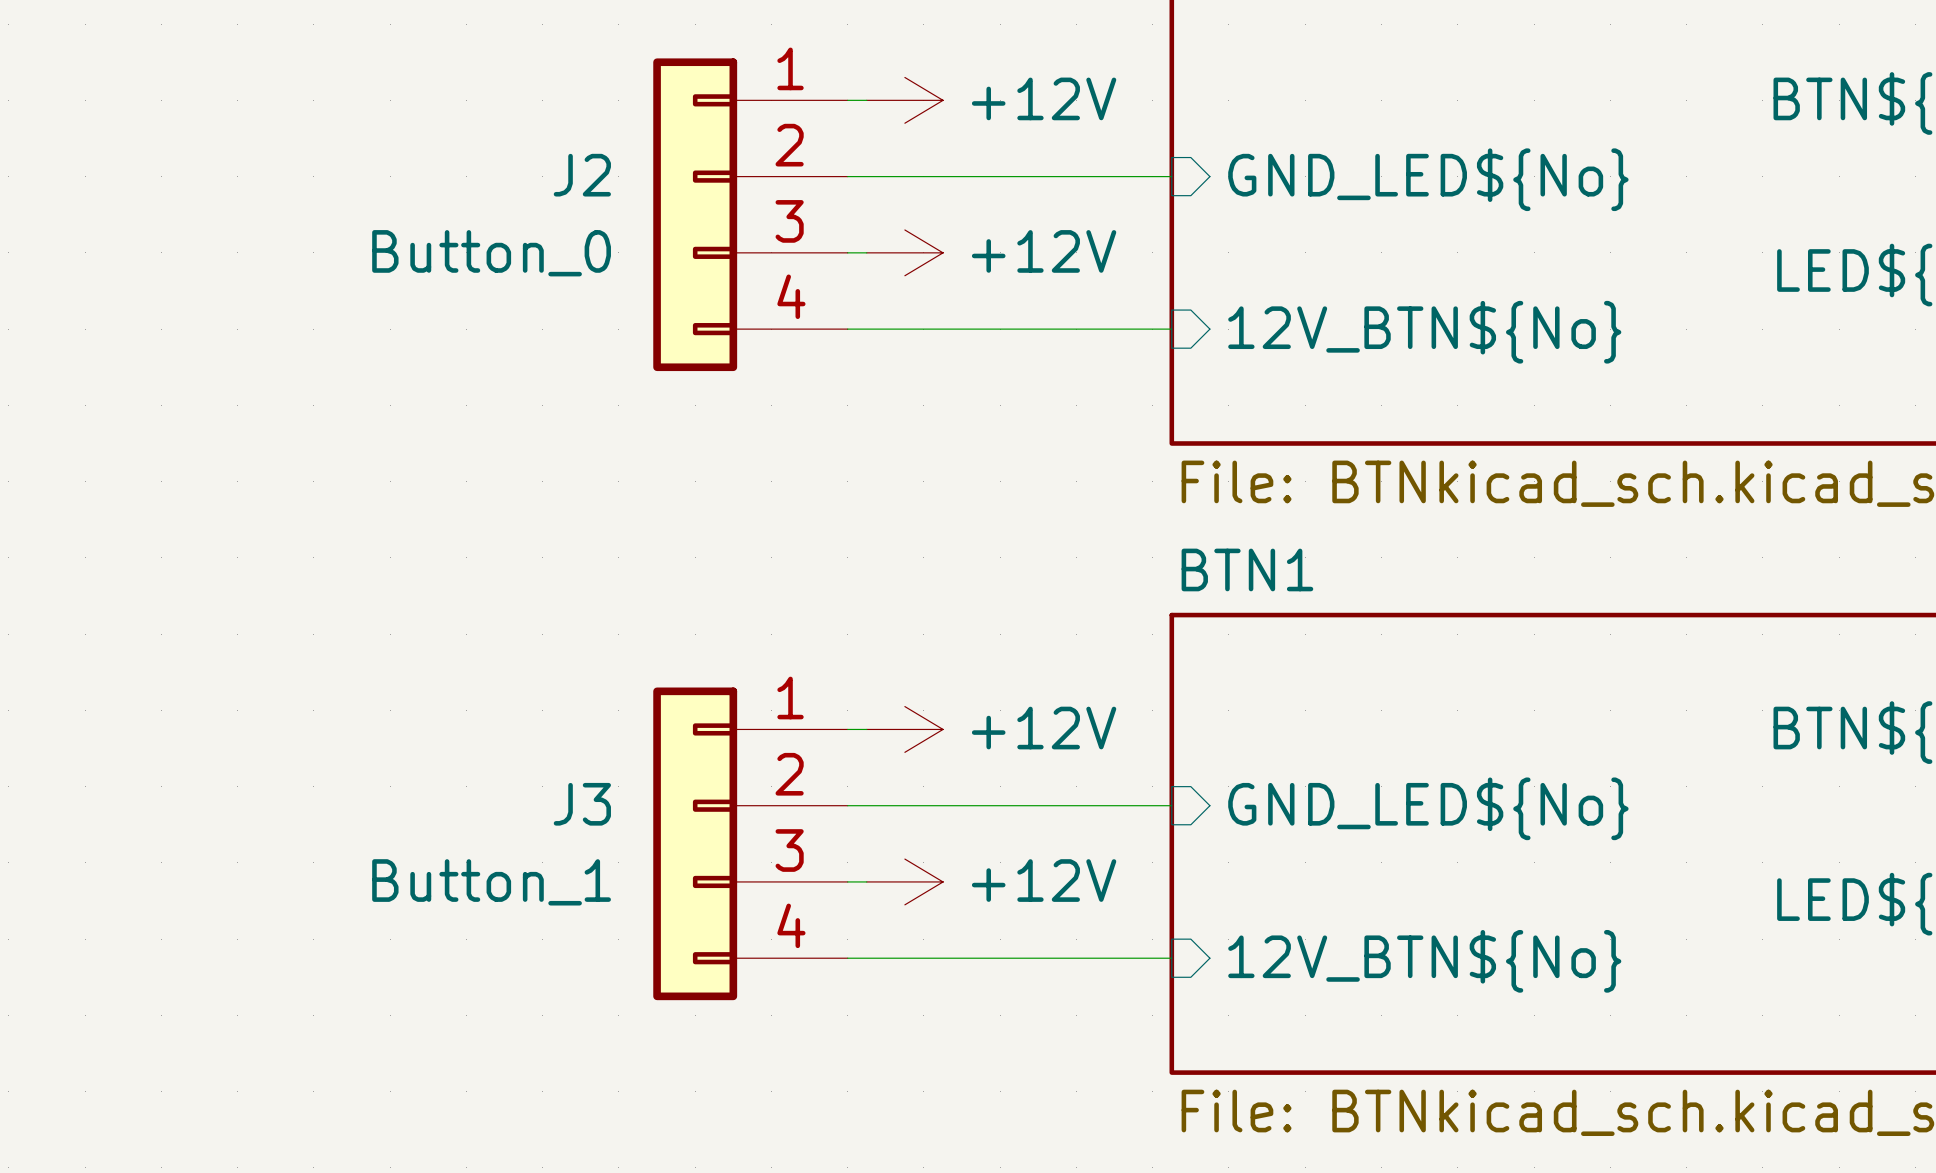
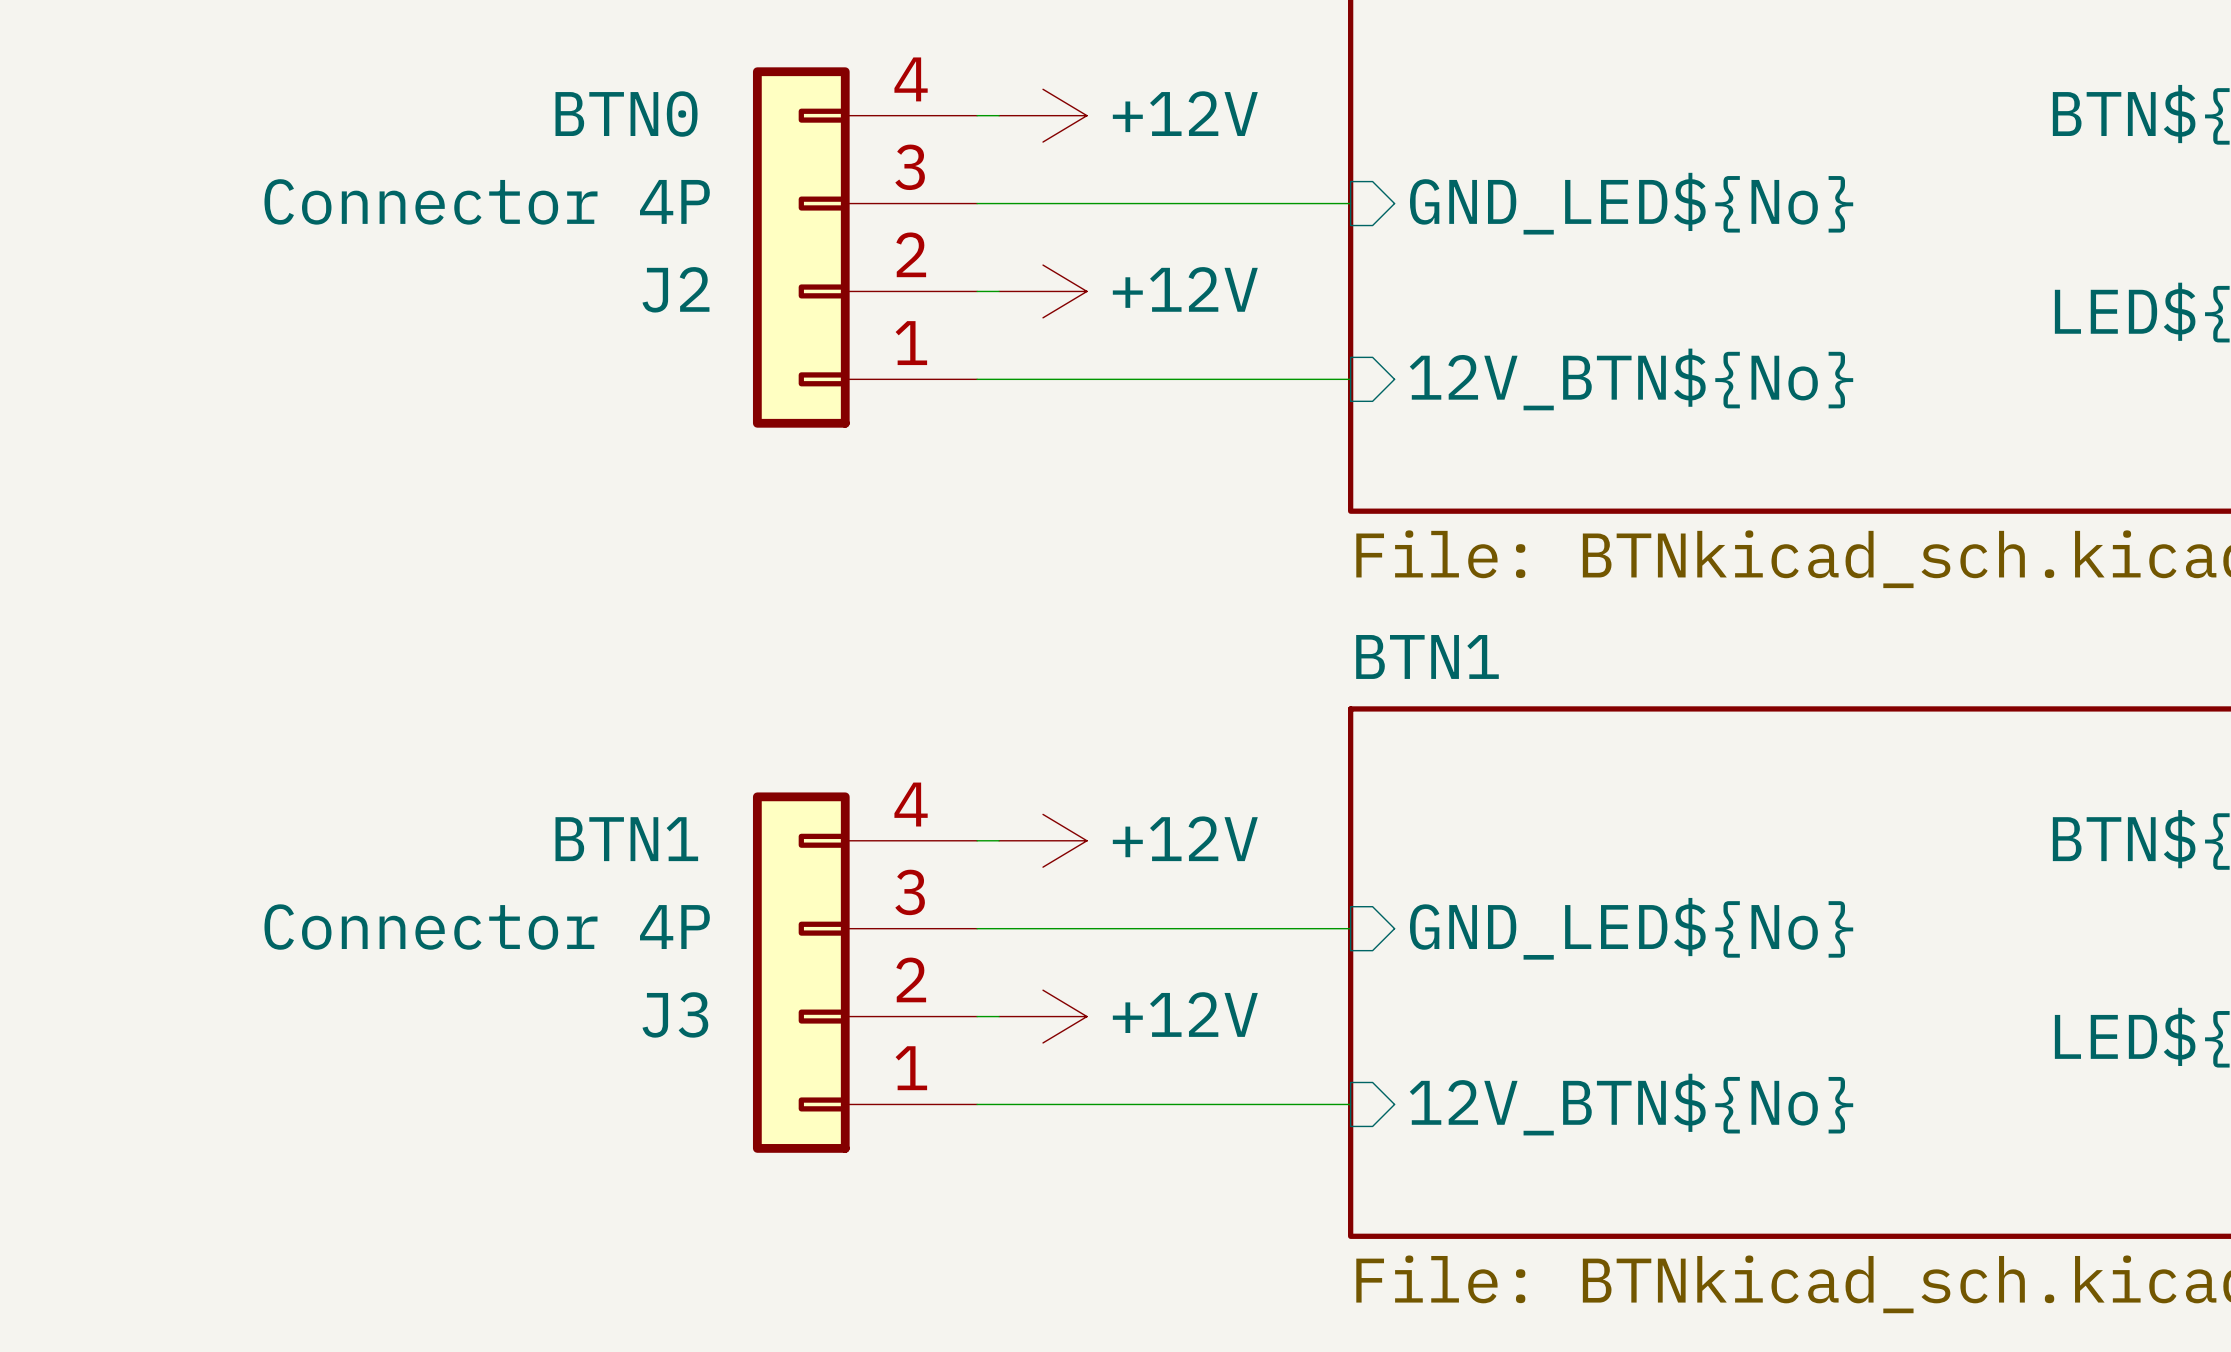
J2 text: none -> BTN0 (626, 114)
J2 flip: as is (695, 214) -> up-down (801, 247)
J2 value: Button_0 (491, 253) -> Connector 4P (487, 201)
J3 text: none -> BTN1 (626, 839)
J3 flip: as is (695, 843) -> up-down (801, 972)
J3 value: Button_1 (491, 882) -> Connector 4P (487, 927)

